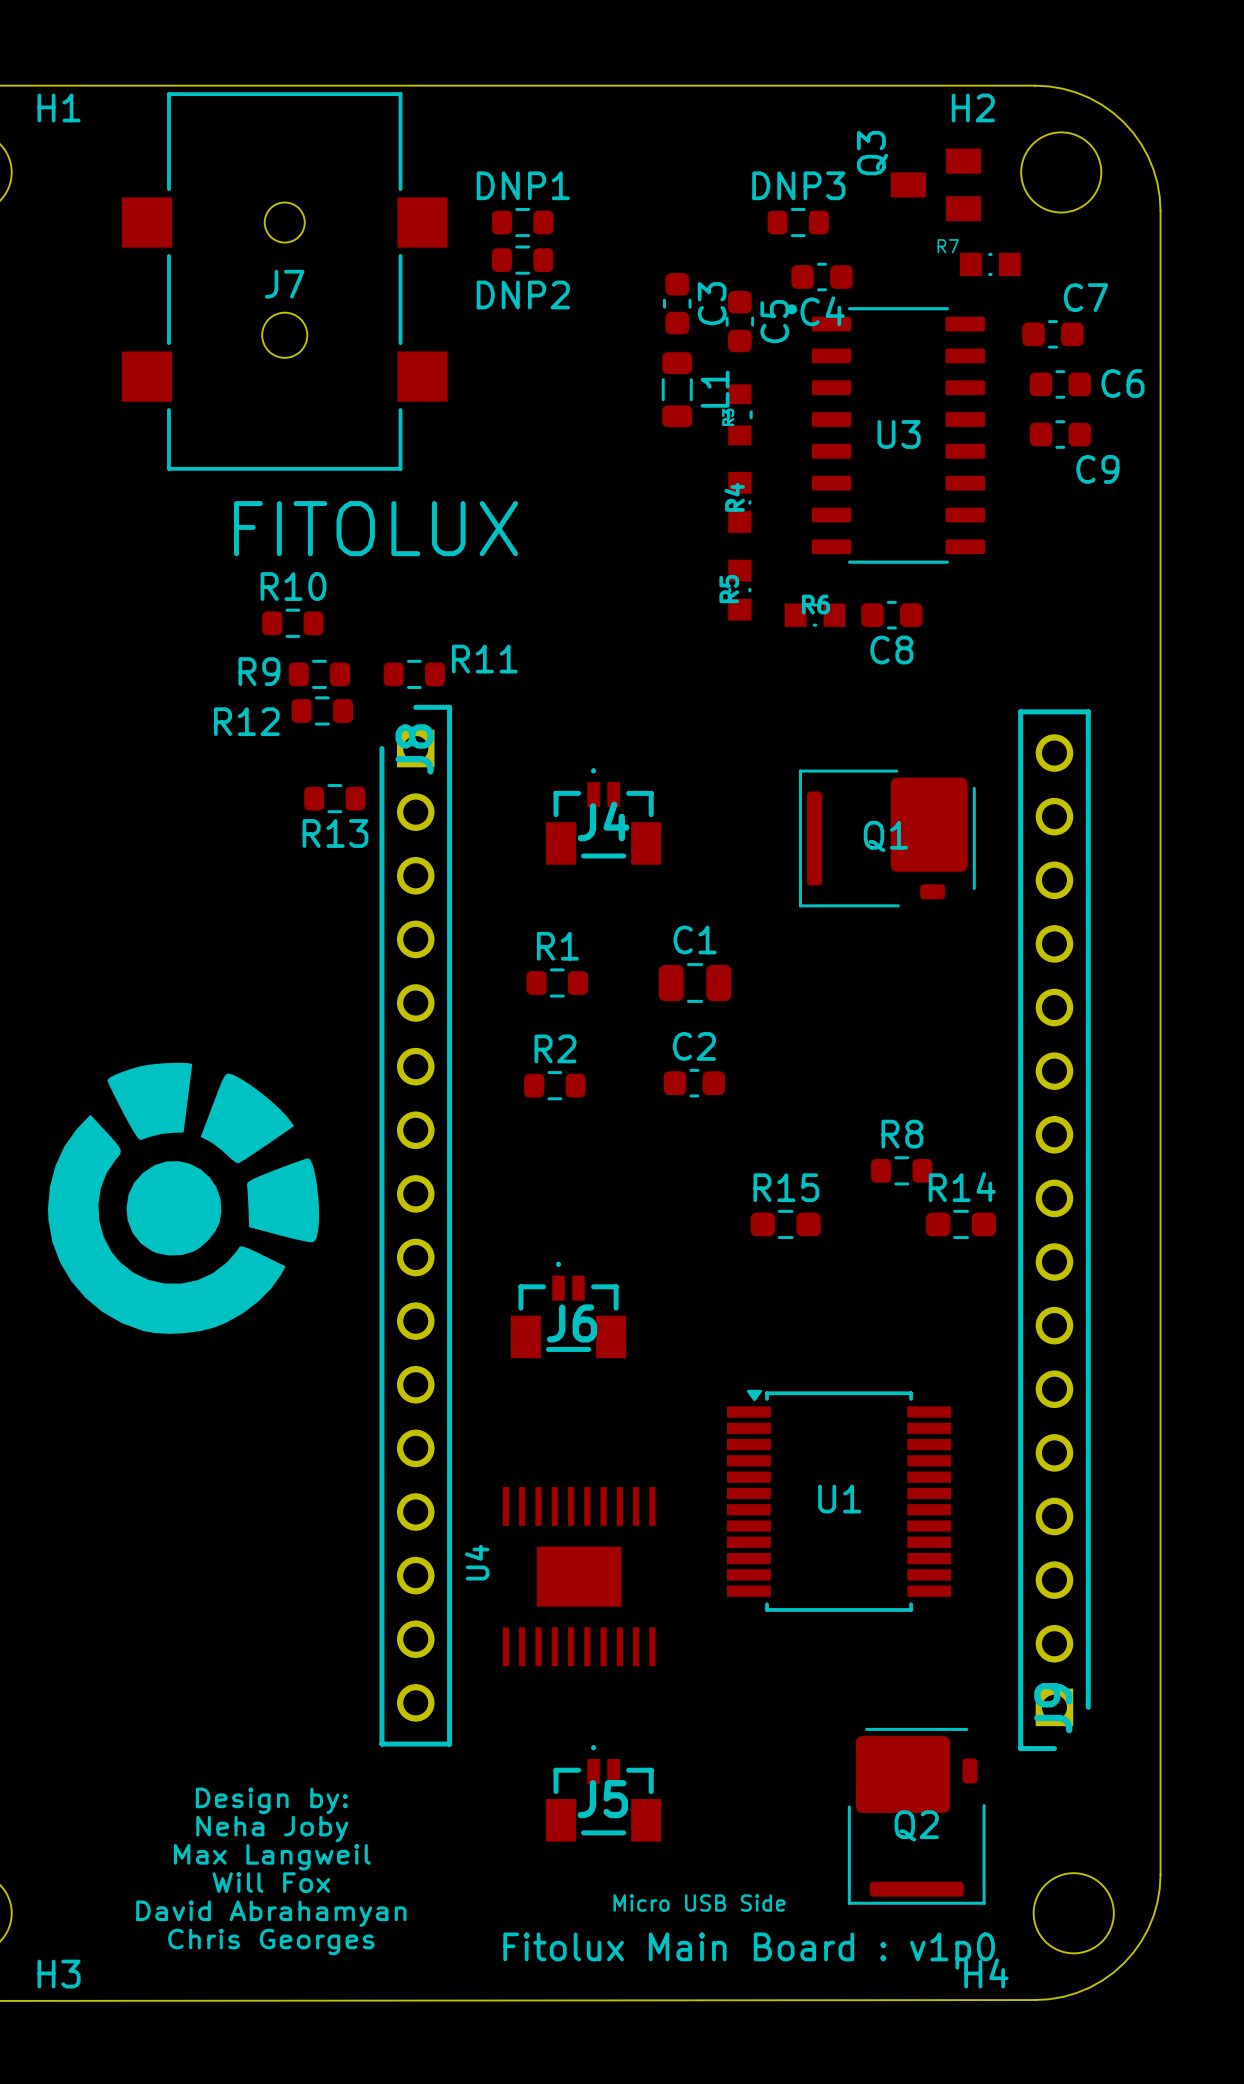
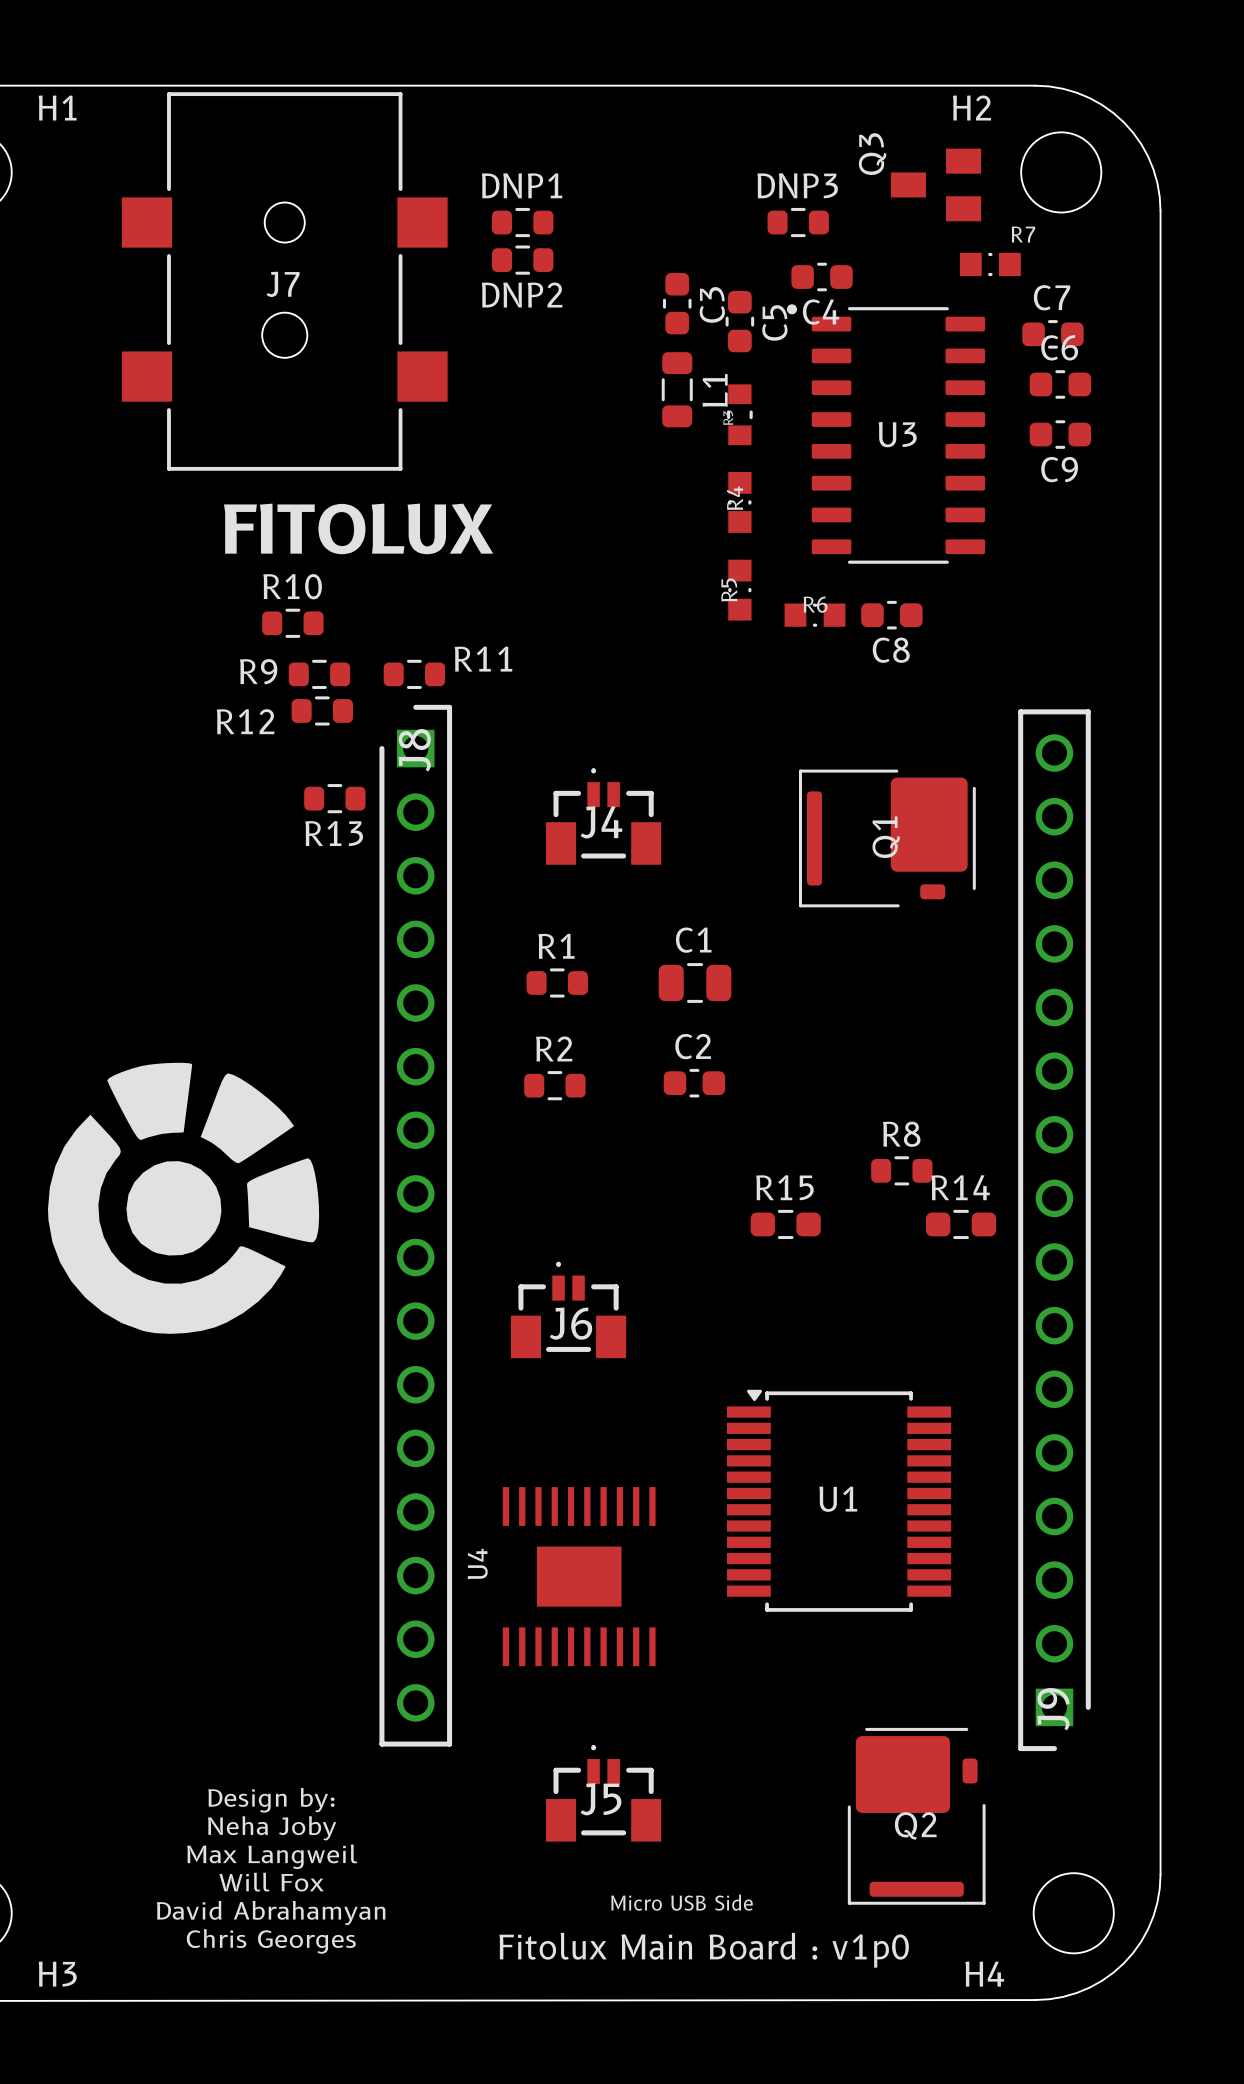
R7 name position: R7 (948, 246) -> R7 (1023, 234)
C7 name position: C7 (1085, 297) -> C7 (1052, 297)
C6 name position: C6 (1122, 383) -> C6 (1059, 347)
C9 name position: C9 (1097, 469) -> C9 (1059, 469)
Q1 name rotation: 0° (885, 836) -> 90° counterclockwise (886, 837)

